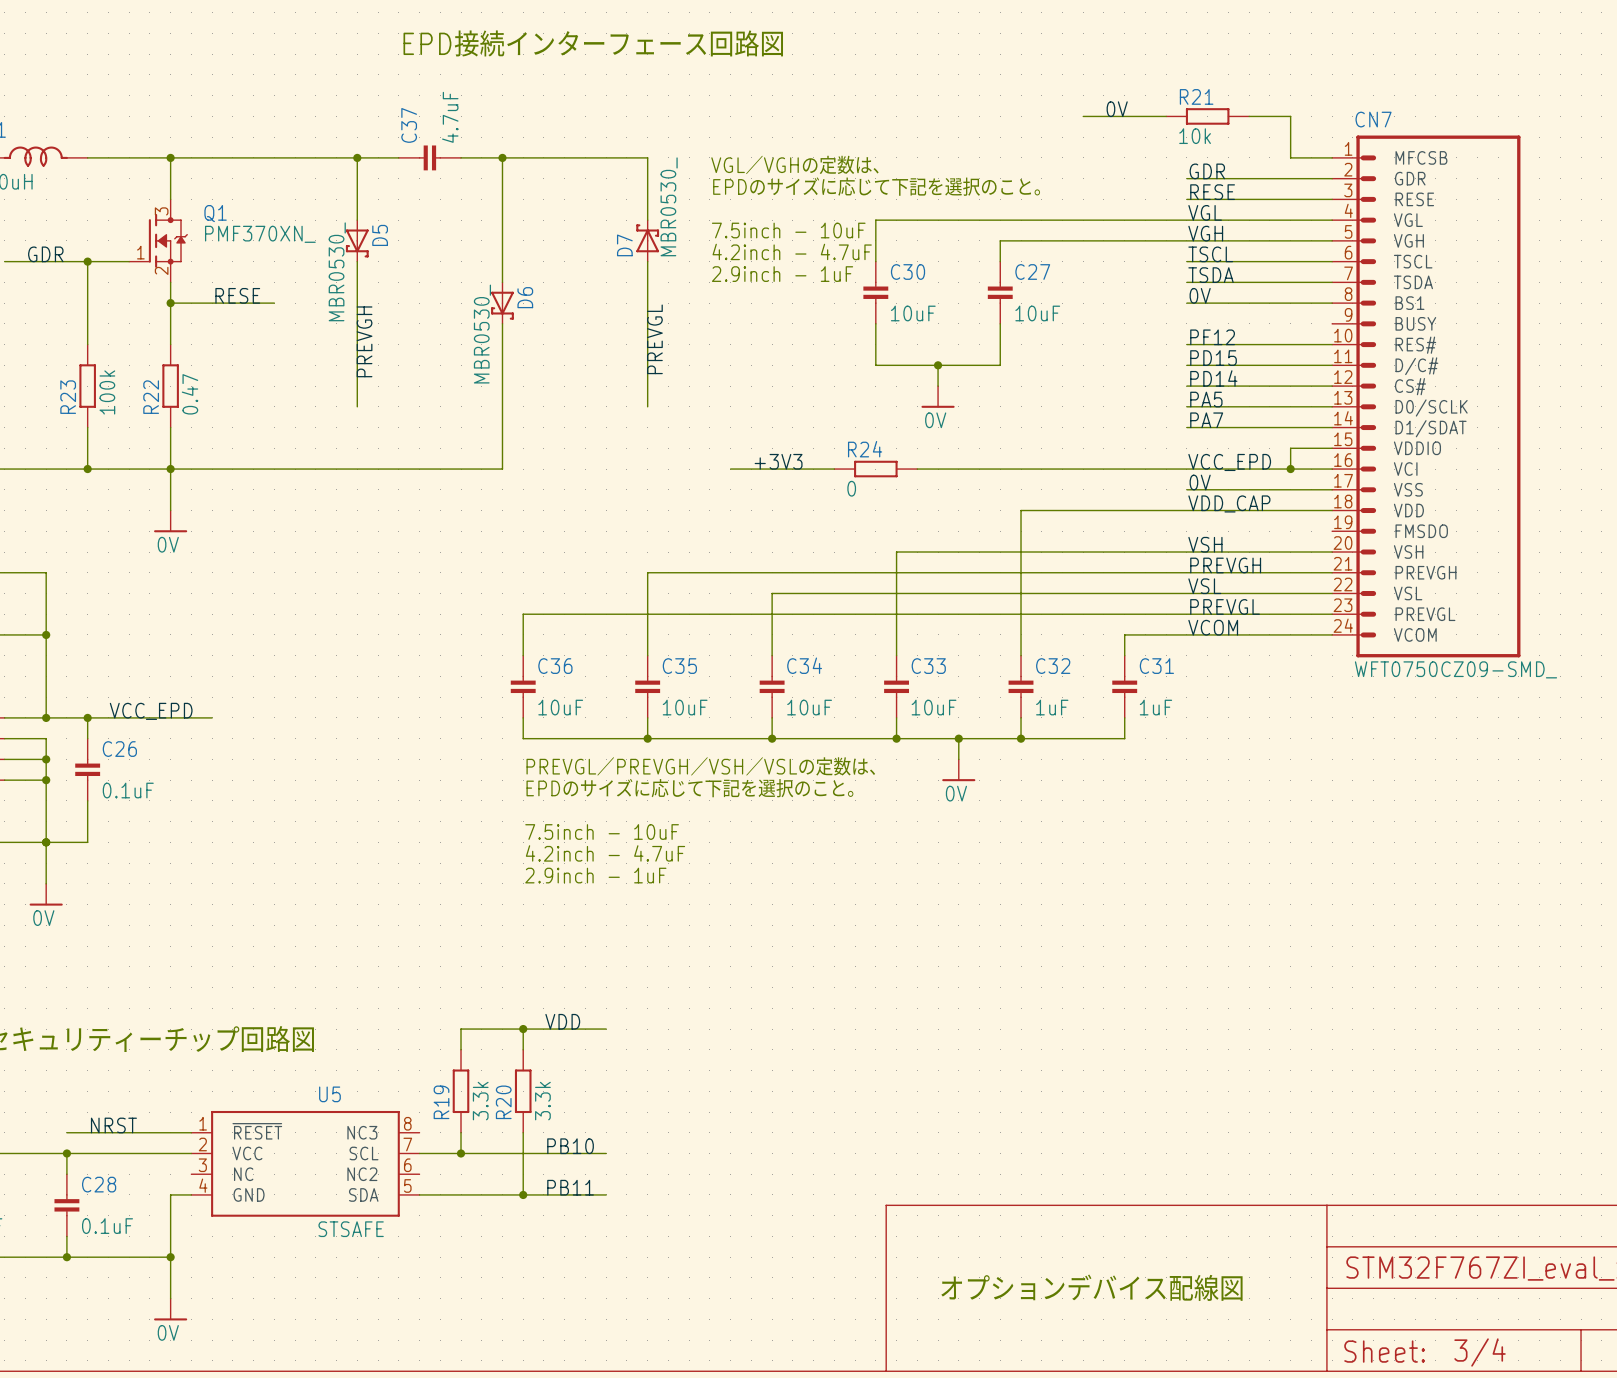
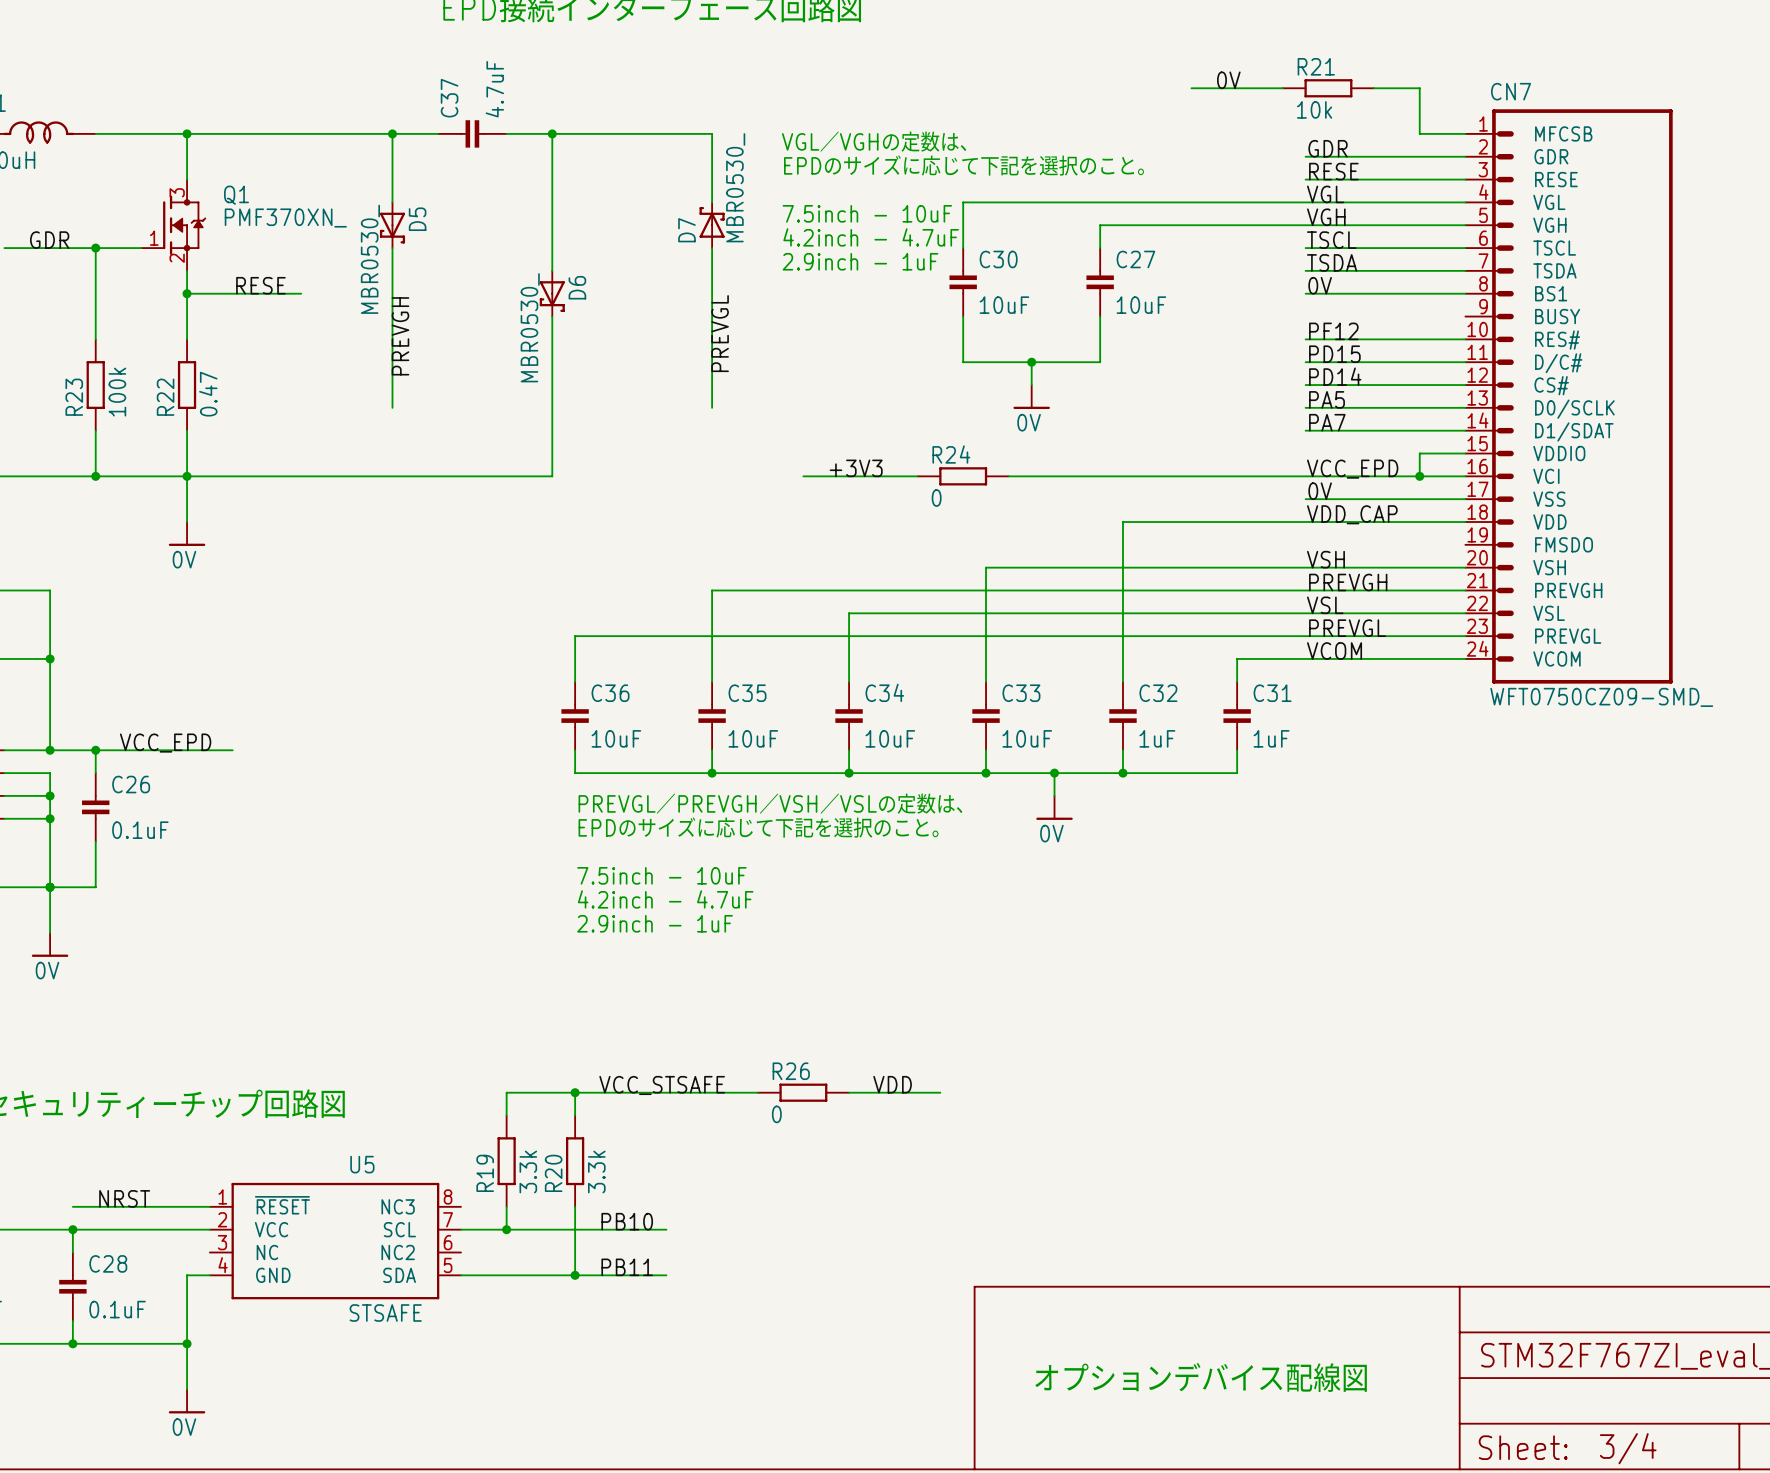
label: VDD (562, 1021) -> VCC_STSAFE (662, 1085)
label: none -> VDD (892, 1084)
wire: none -> (666, 1092) (757, 1092)
R26: none -> 0 (803, 1092)
wire: none -> (849, 1092) (940, 1092)

